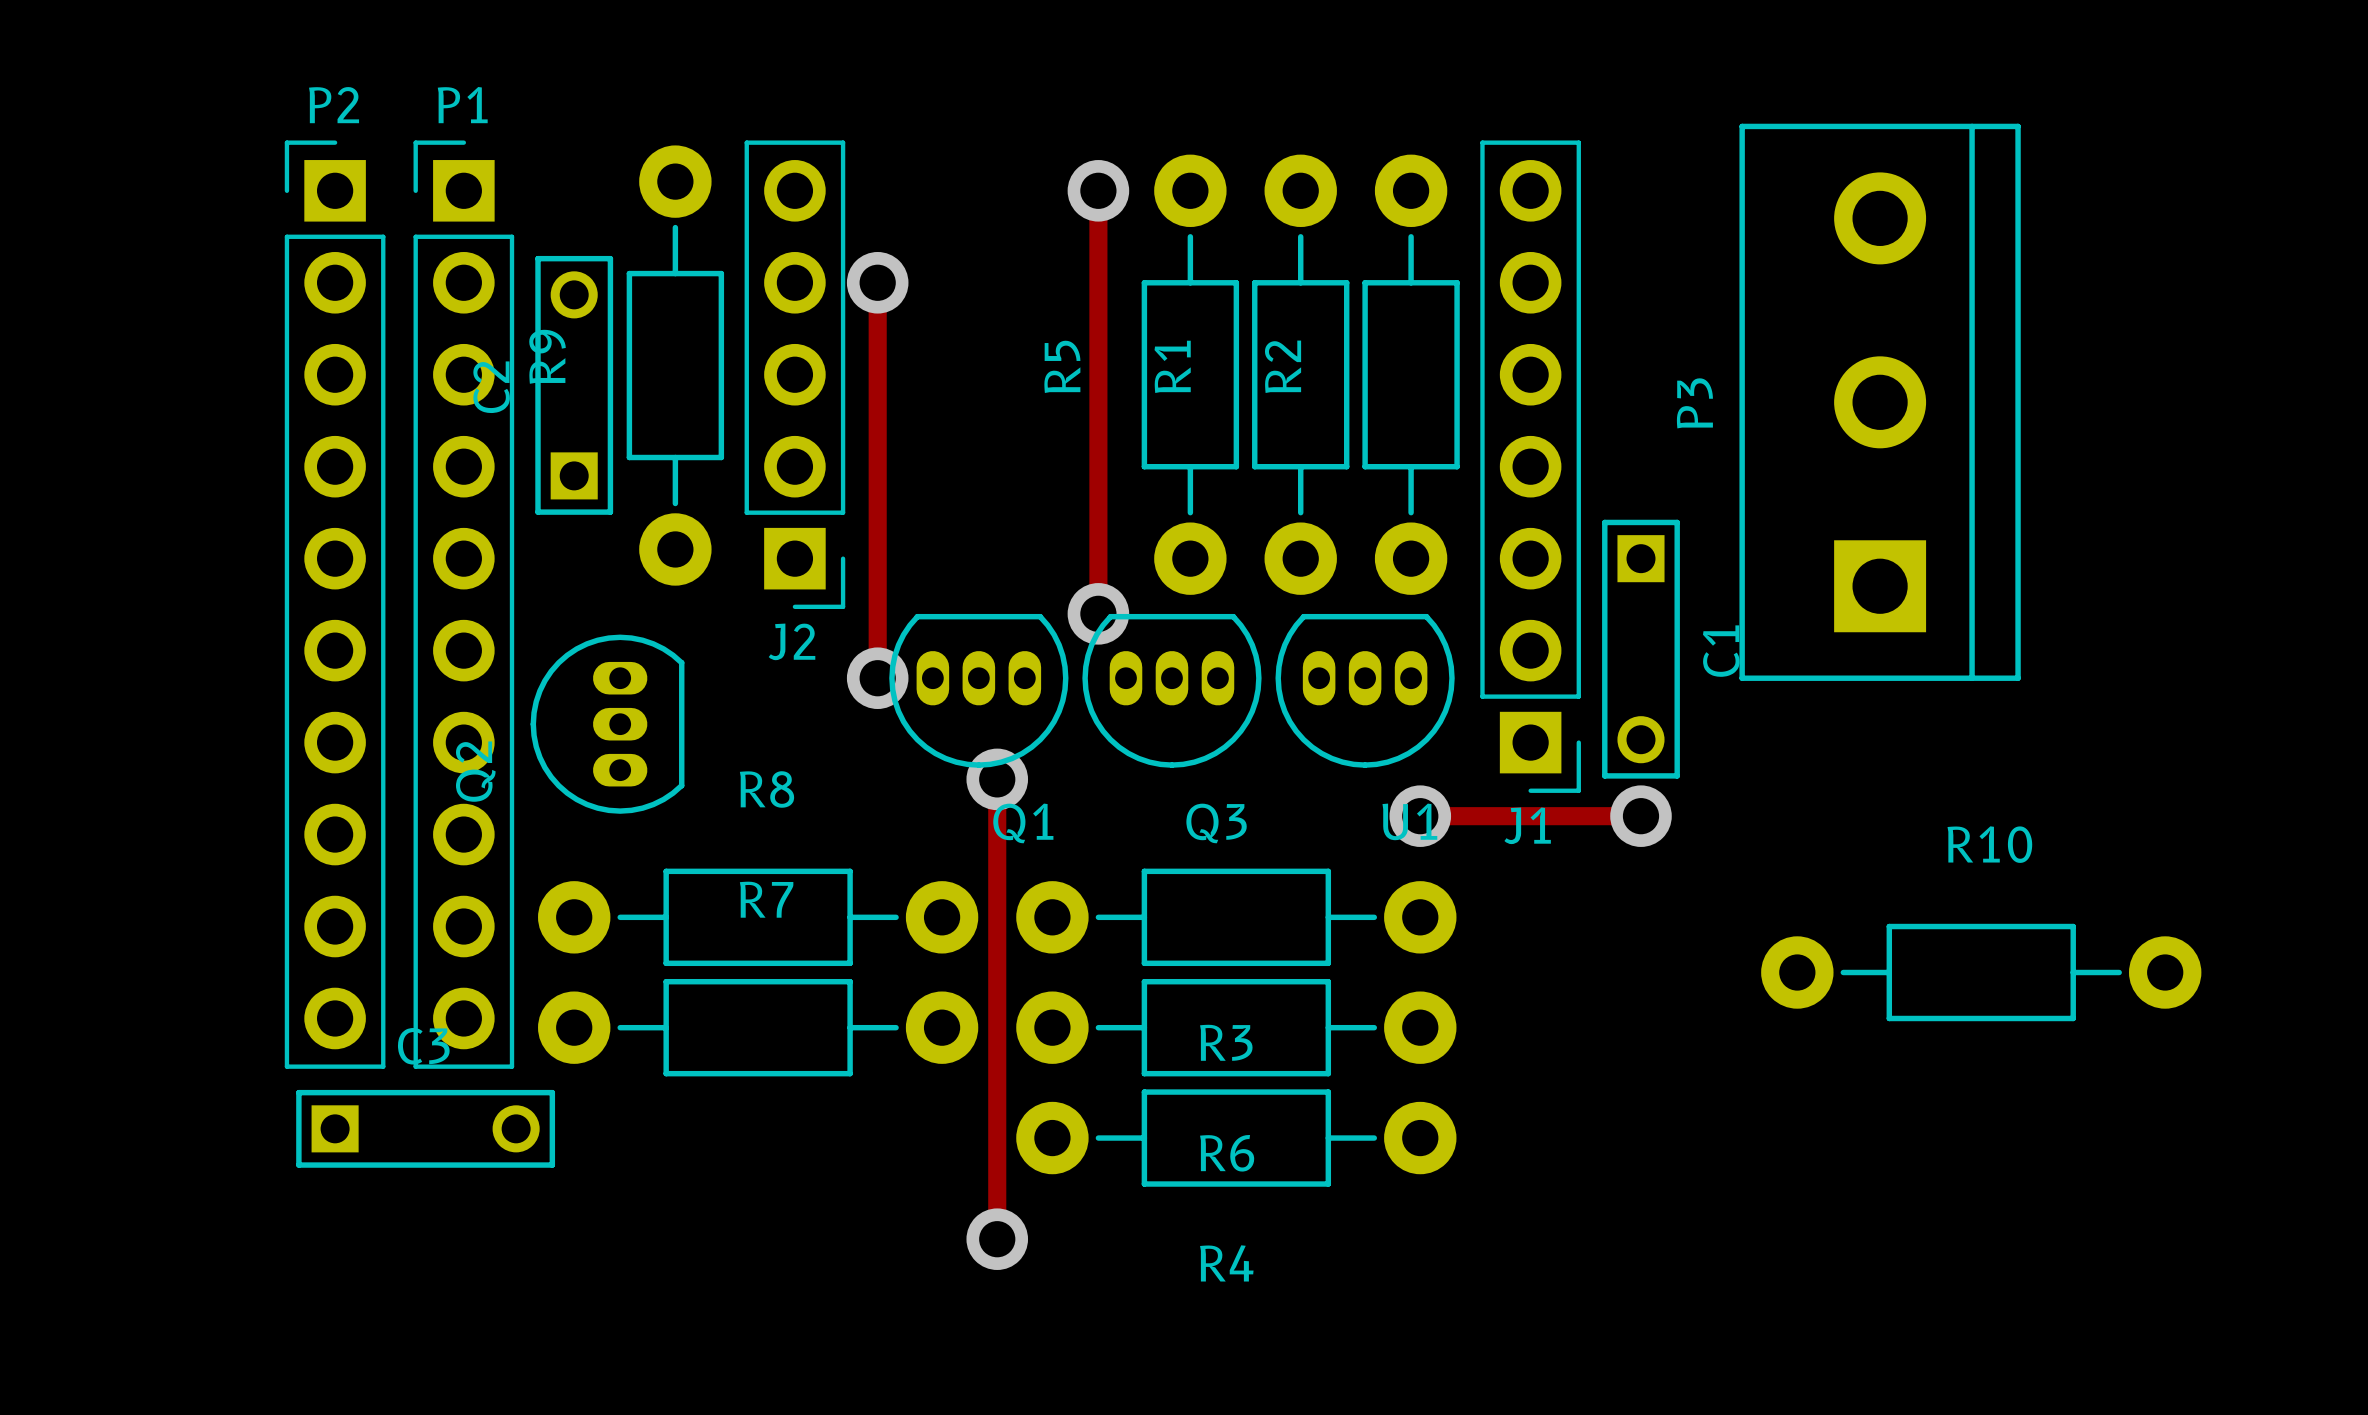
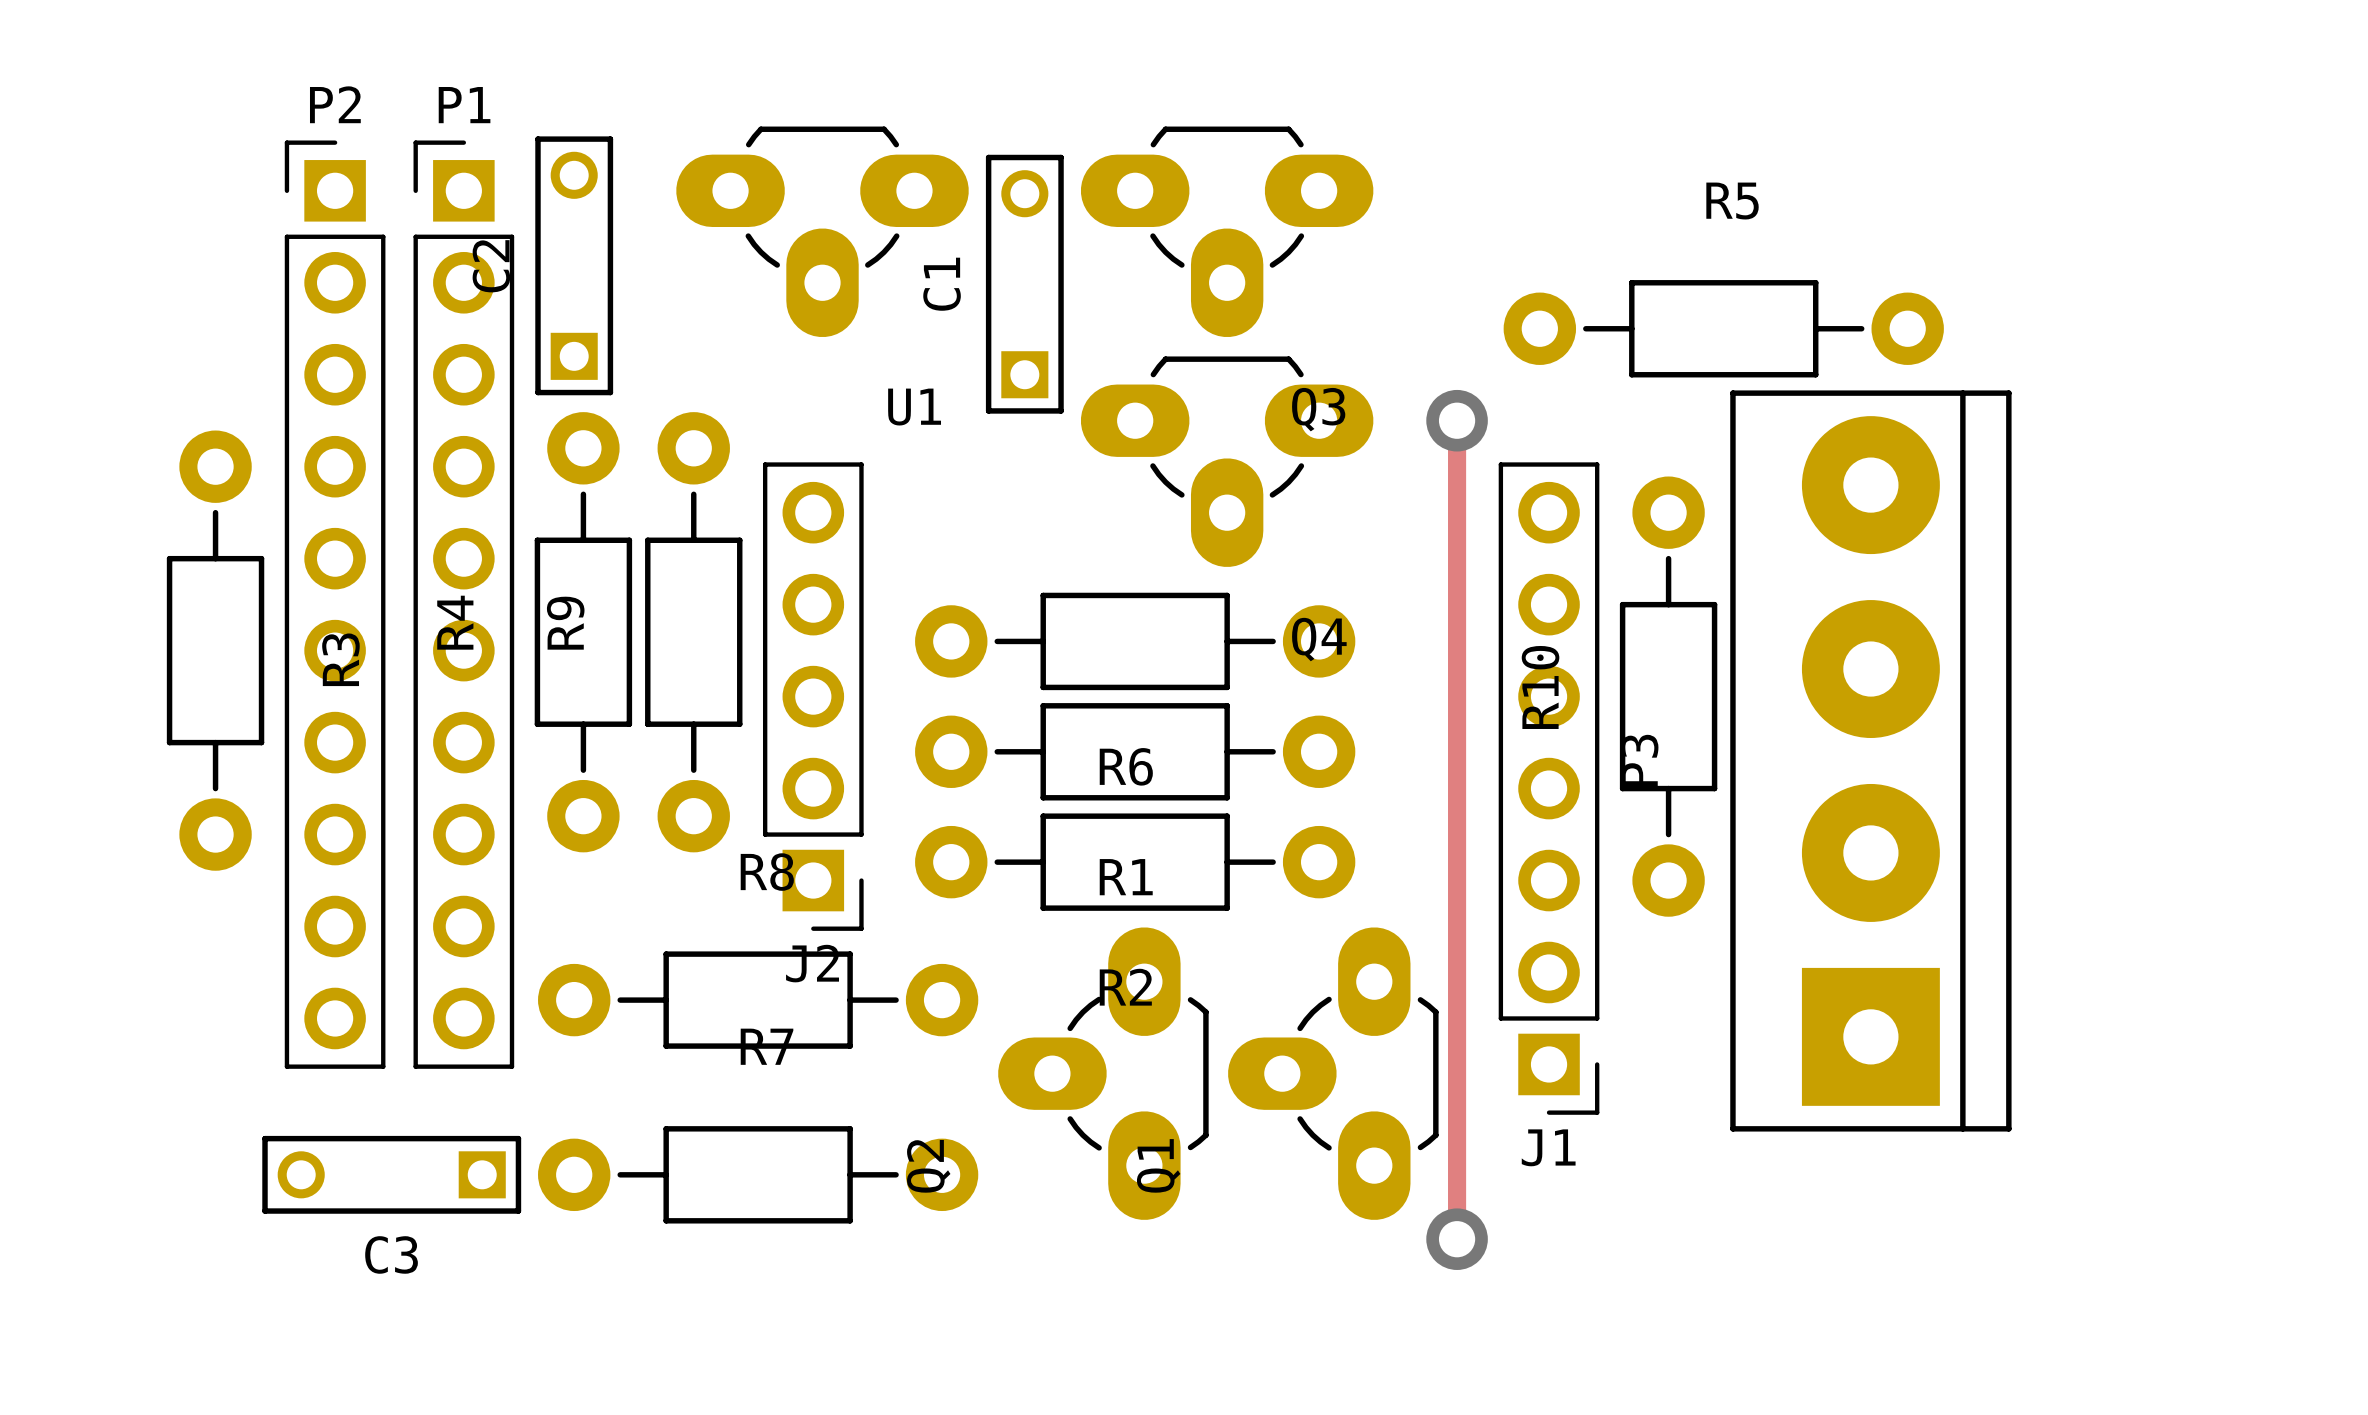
P3 footprint: [1739, 123, 2021, 681] -> [1730, 390, 2012, 1132]
track: (1098, 190) (1098, 613) -> none
via: (1098, 190) -> none
track: (877, 282) (877, 678) -> none
via: (877, 282) -> none
R9 position: (675, 365) -> (693, 632)
R1 name position: R1 (1172, 366) -> R1 (1126, 877)
R2 name position: R2 (1283, 366) -> R2 (1125, 987)
J2 position: (794, 374) -> (813, 696)
R5 rotation: 0° (1190, 374) -> 90° clockwise (1723, 328)
R5 position: (1190, 374) -> (1723, 328)
R1 rotation: 0° (1300, 374) -> 90° clockwise (1135, 751)
R1 position: (1300, 374) -> (1135, 751)
R2 rotation: 0° (1411, 374) -> 90° clockwise (1135, 862)
R2 position: (1411, 374) -> (1135, 862)
C2 position: (574, 385) -> (574, 265)
track: none -> (1457, 420) (1457, 1239)
via: none -> (1457, 420)
Q4: none -> (1227, 461)
J1 position: (1530, 466) -> (1549, 788)
Q1 footprint: [889, 613, 1069, 768] -> [1228, 927, 1439, 1220]
Q3 footprint: [1082, 613, 1262, 768] -> [1080, 126, 1374, 338]
via: (1098, 613) -> none
U1 footprint: [1275, 613, 1455, 768] -> [676, 126, 969, 338]
Q2 footprint: [530, 634, 685, 814] -> [998, 927, 1209, 1220]
C1 rotation: 0° (1640, 649) -> 180° (1024, 284)
C1 position: (1640, 649) -> (1024, 284)
via: (877, 678) -> none
track: (997, 779) (997, 1239) -> none
via: (997, 779) -> none
track: (1420, 816) (1640, 816) -> none
via: (1420, 816) -> none
via: (1640, 816) -> none
Q1 name position: Q1 (1023, 823) -> Q1 (1158, 1165)
R10 name position: R10 (1989, 844) -> R10 (1540, 687)
R8 position: (758, 917) -> (758, 1000)
R3 rotation: 0° (1236, 917) -> 90° clockwise (215, 650)
R3 position: (1236, 917) -> (215, 650)
R10 rotation: 0° (1981, 972) -> 90° clockwise (1668, 696)
R10 position: (1981, 972) -> (1668, 696)
R7 position: (758, 1027) -> (758, 1174)
R6 position: (1236, 1027) -> (1135, 641)
R3 name position: R3 (1226, 1042) -> R3 (340, 659)
C3 rotation: 0° (425, 1128) -> 180° (391, 1174)
R4 rotation: 0° (1236, 1138) -> 90° clockwise (583, 632)
R4 position: (1236, 1138) -> (583, 632)
via: (997, 1239) -> none
via: none -> (1457, 1239)

